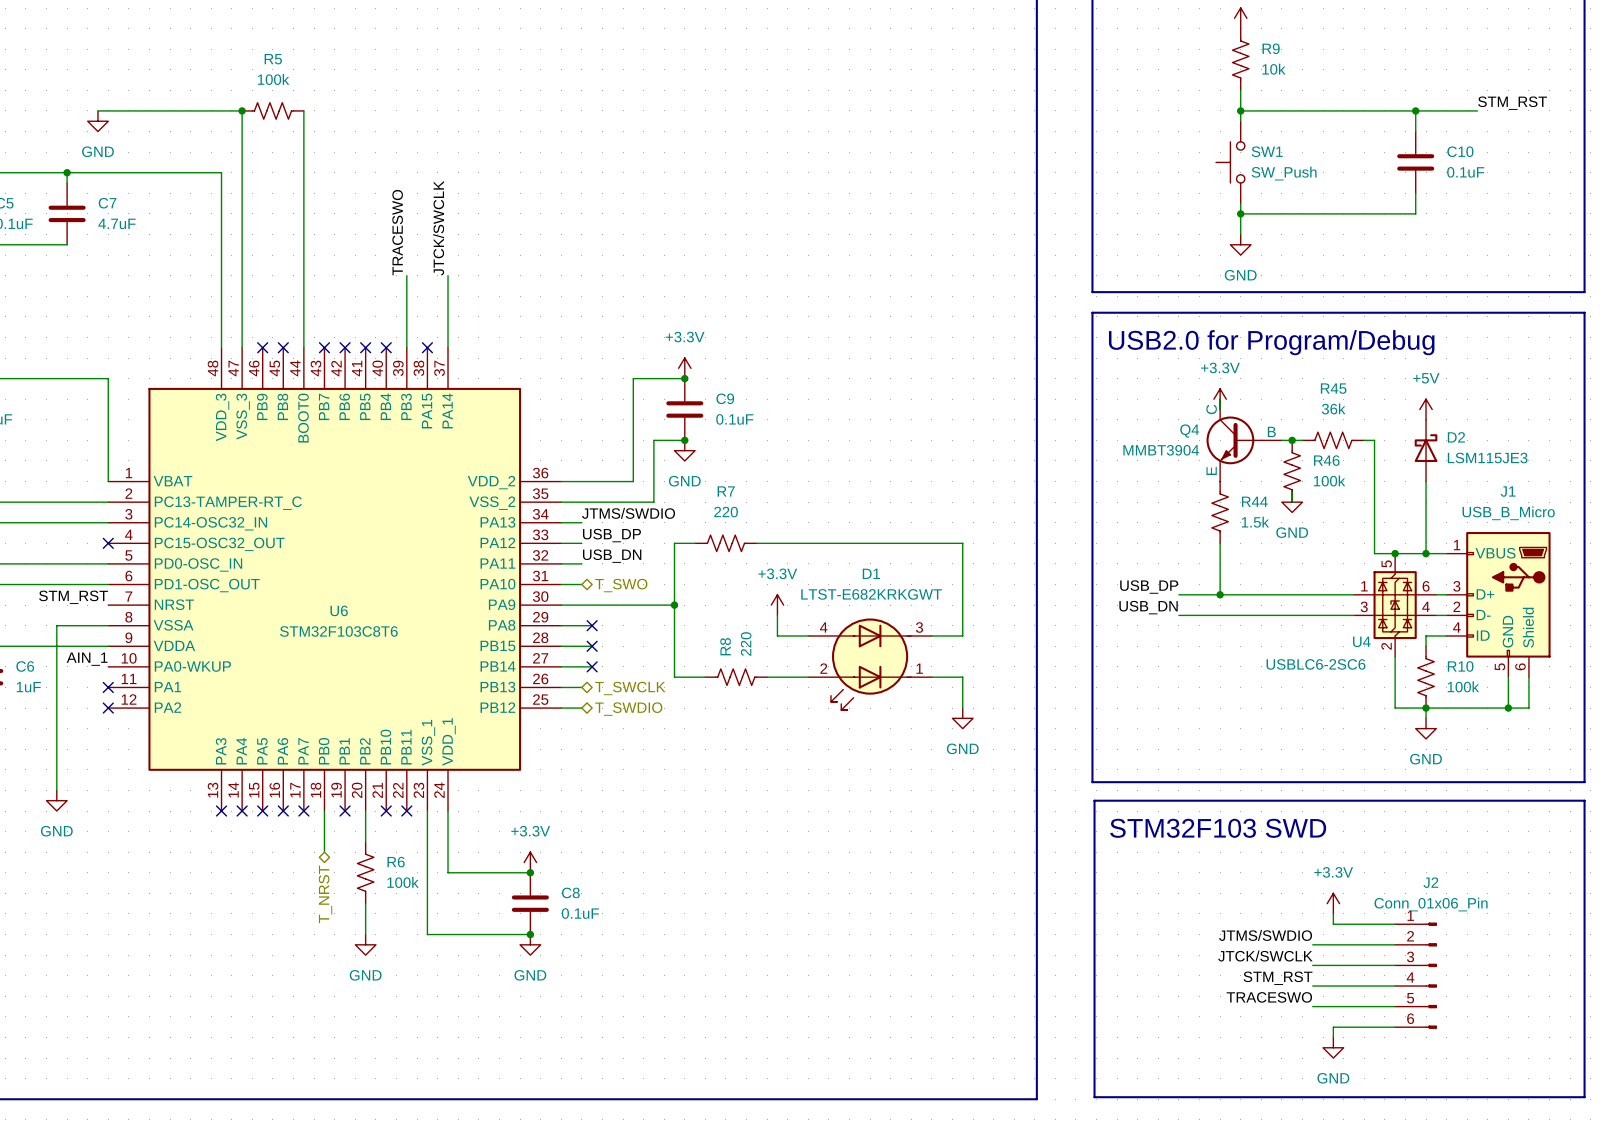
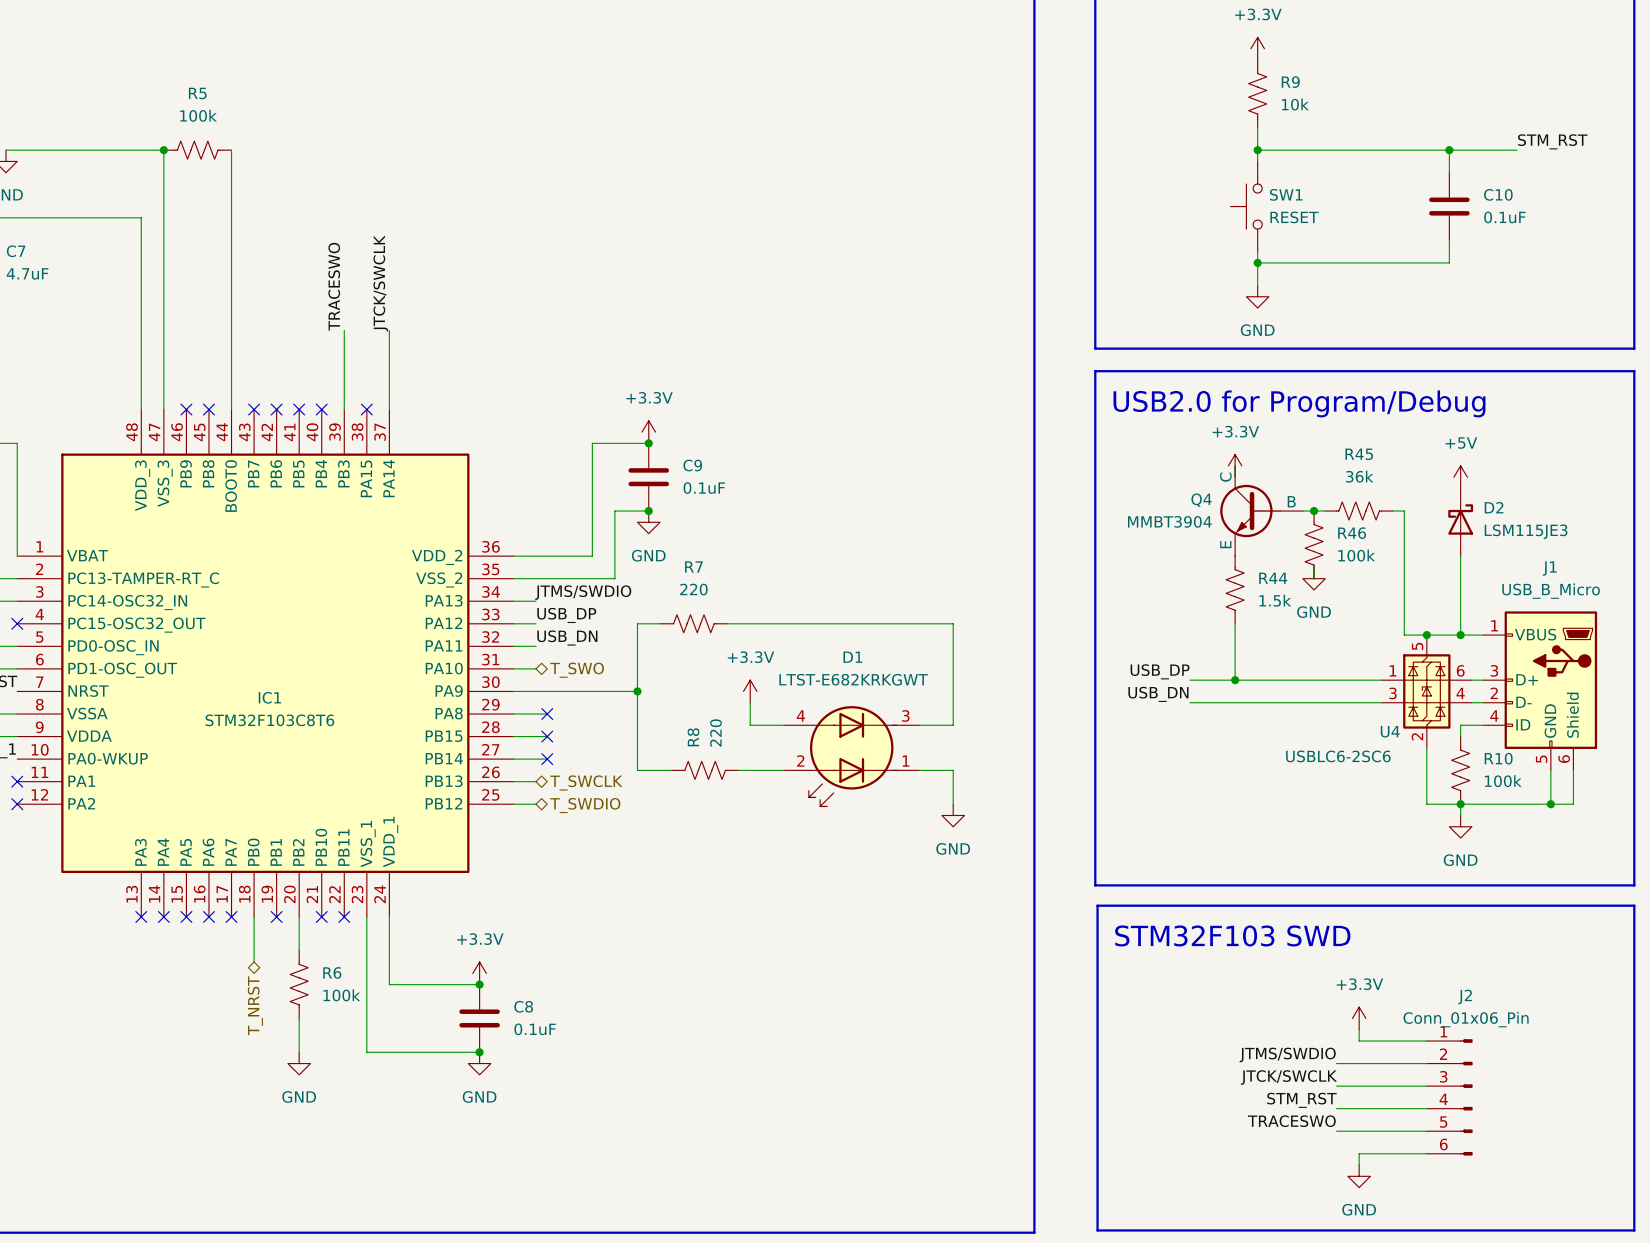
SW1 value: SW_Push (1284, 173) -> RESET (1294, 217)
U6 name: U6 (339, 610) -> IC1 (269, 697)

